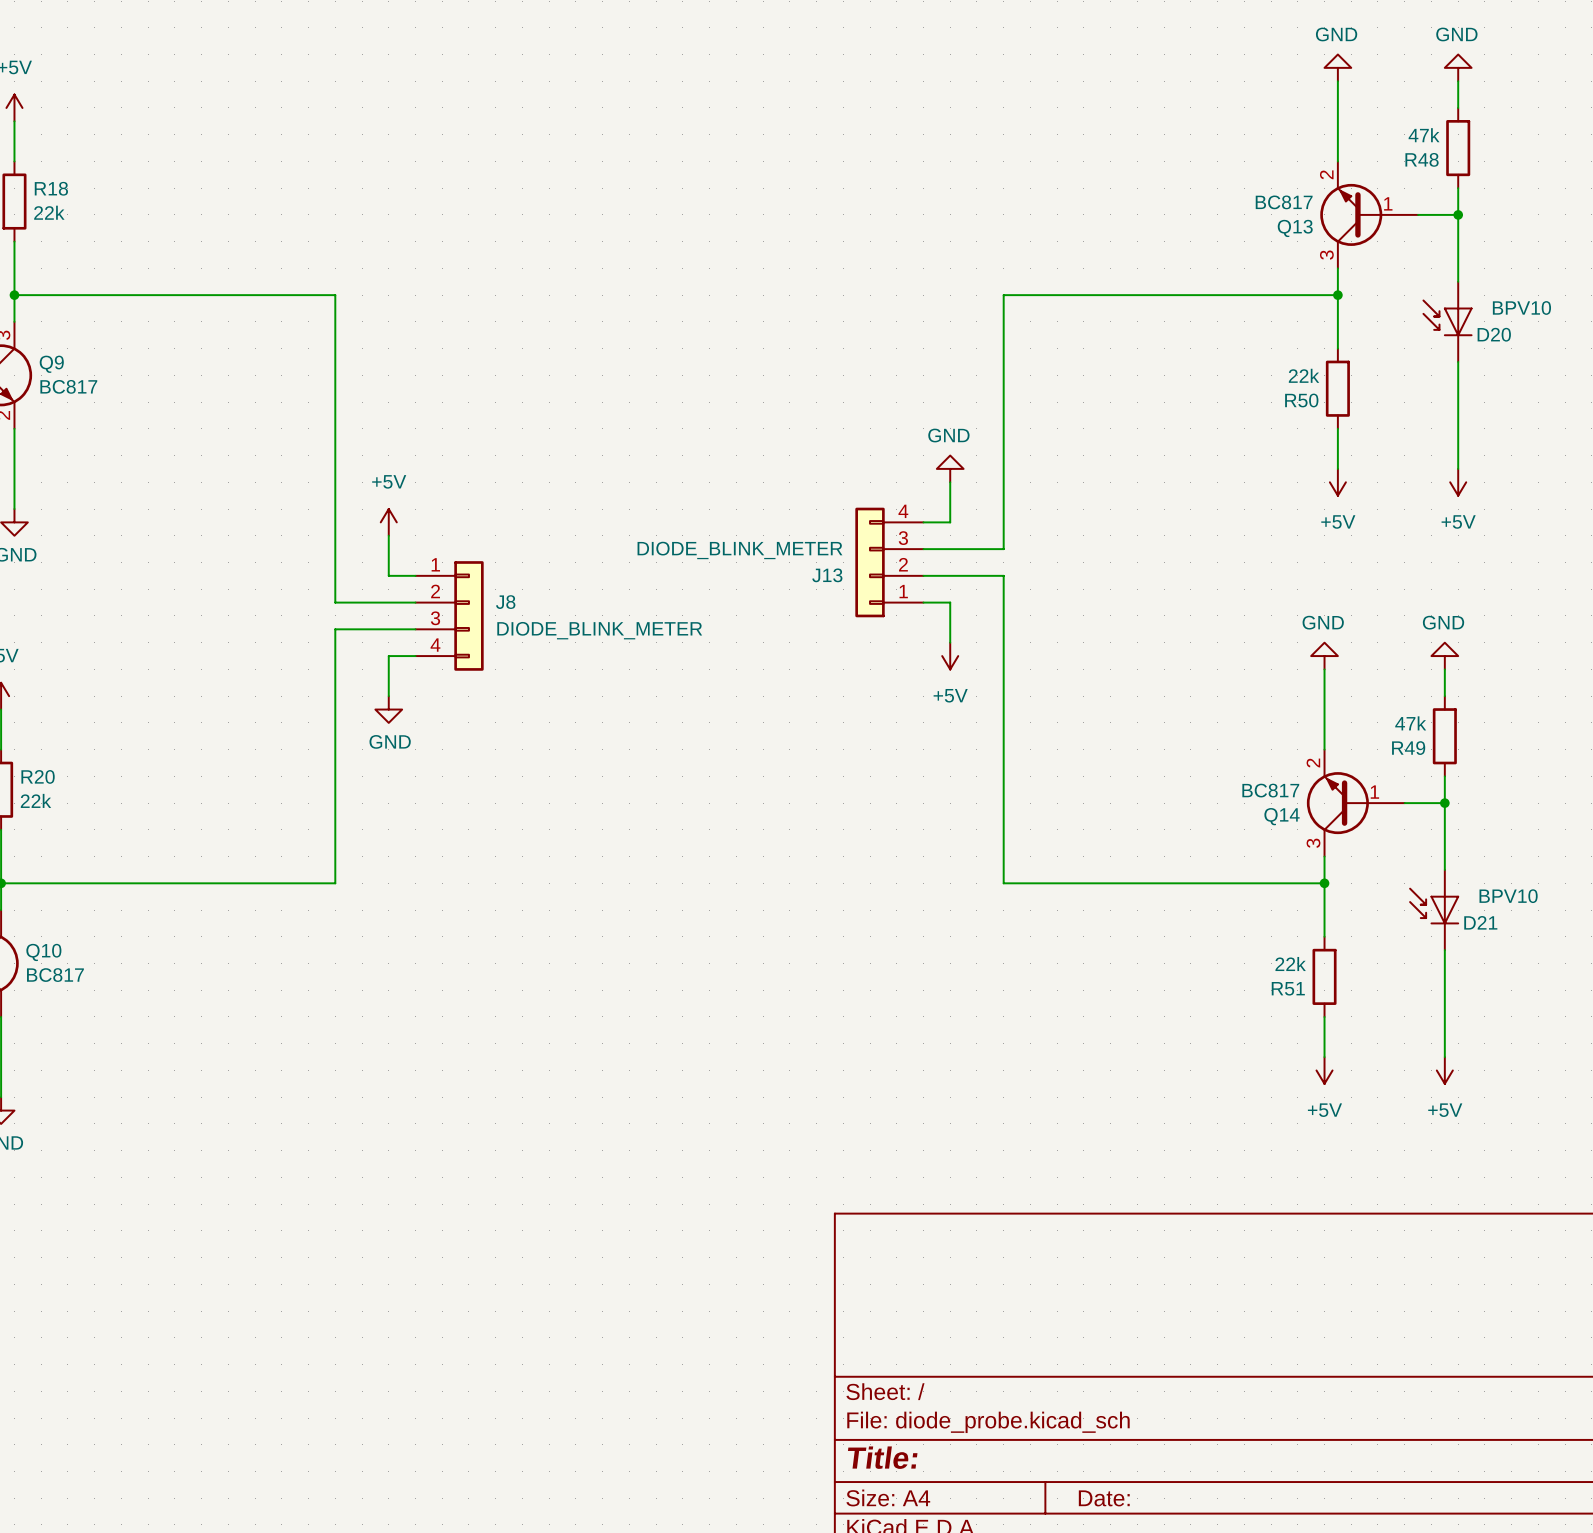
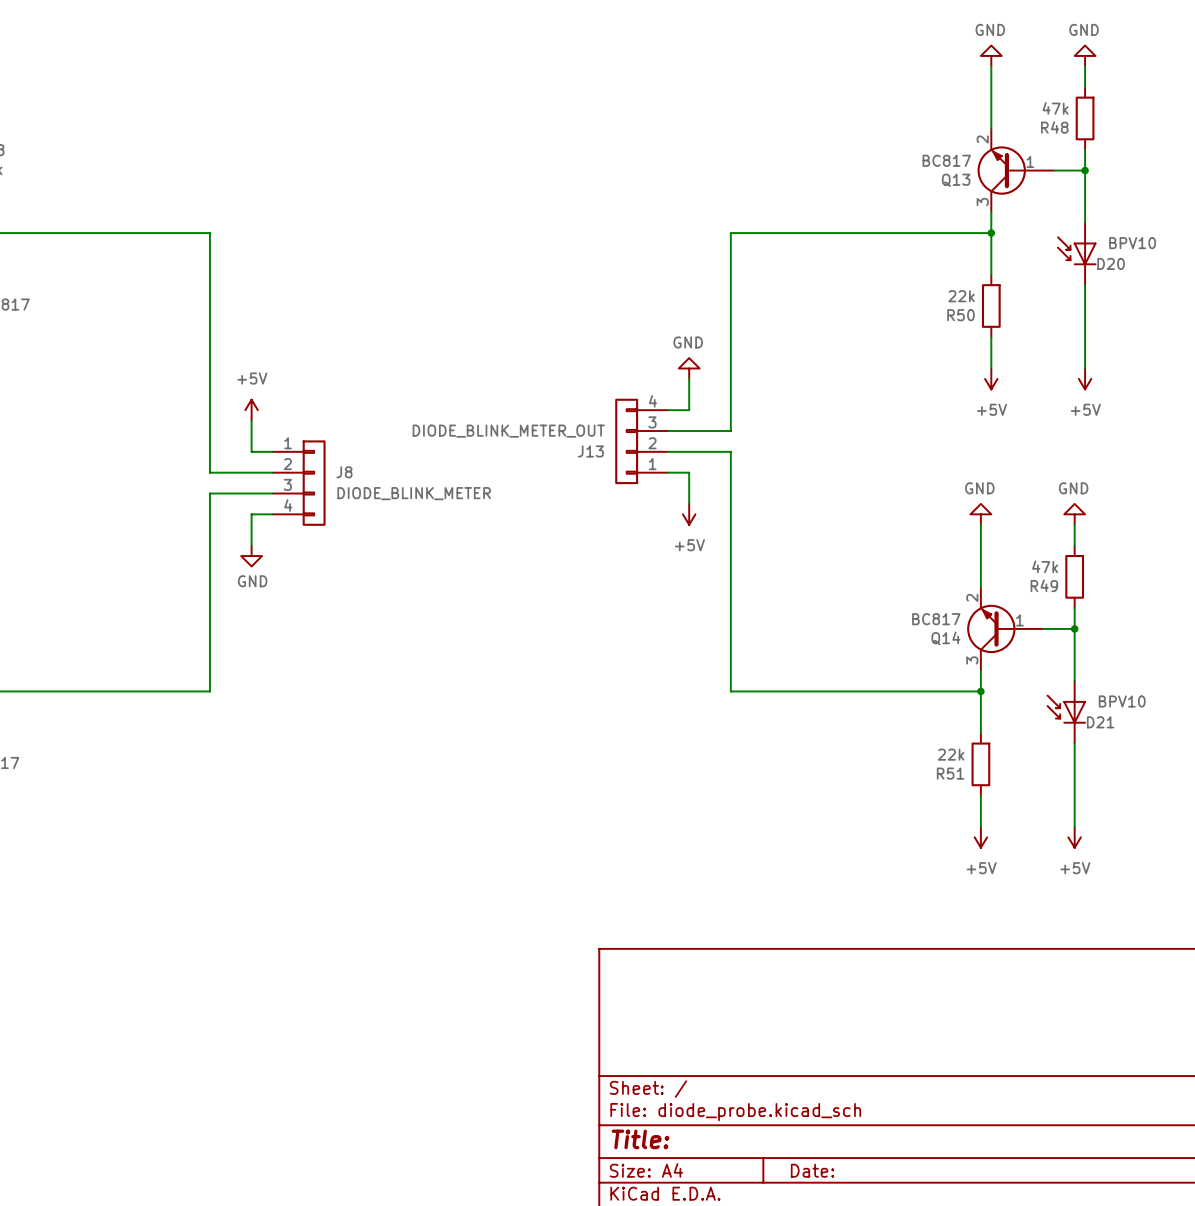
J13 value: DIODE_BLINK_METER (739, 550) -> DIODE_BLINK_METER_OUT (508, 431)

